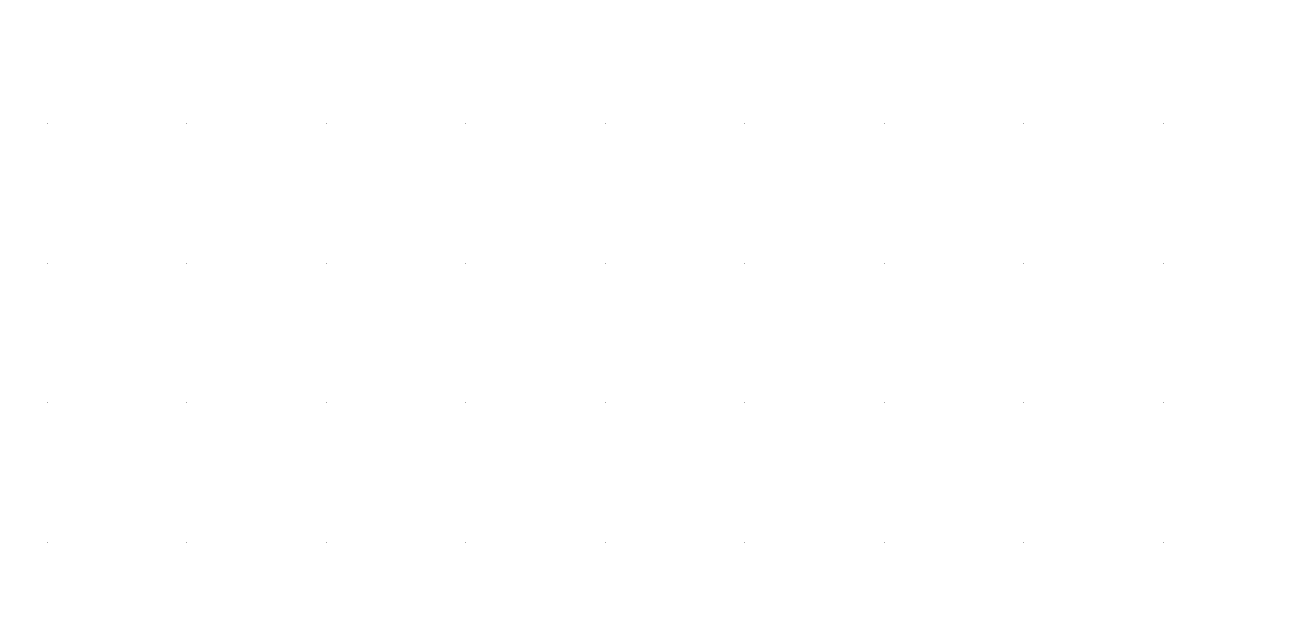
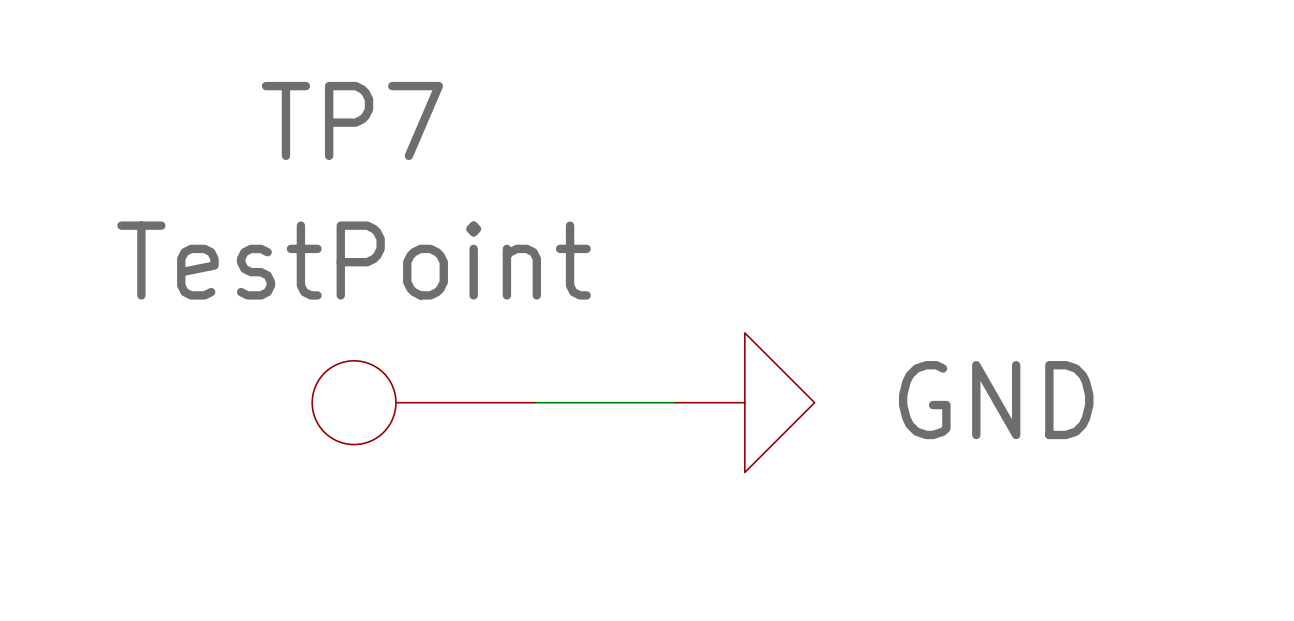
TP7: none -> TestPoint (423, 402)
wire: none -> (535, 402) (675, 402)
power symbol: none -> GND (744, 402)

